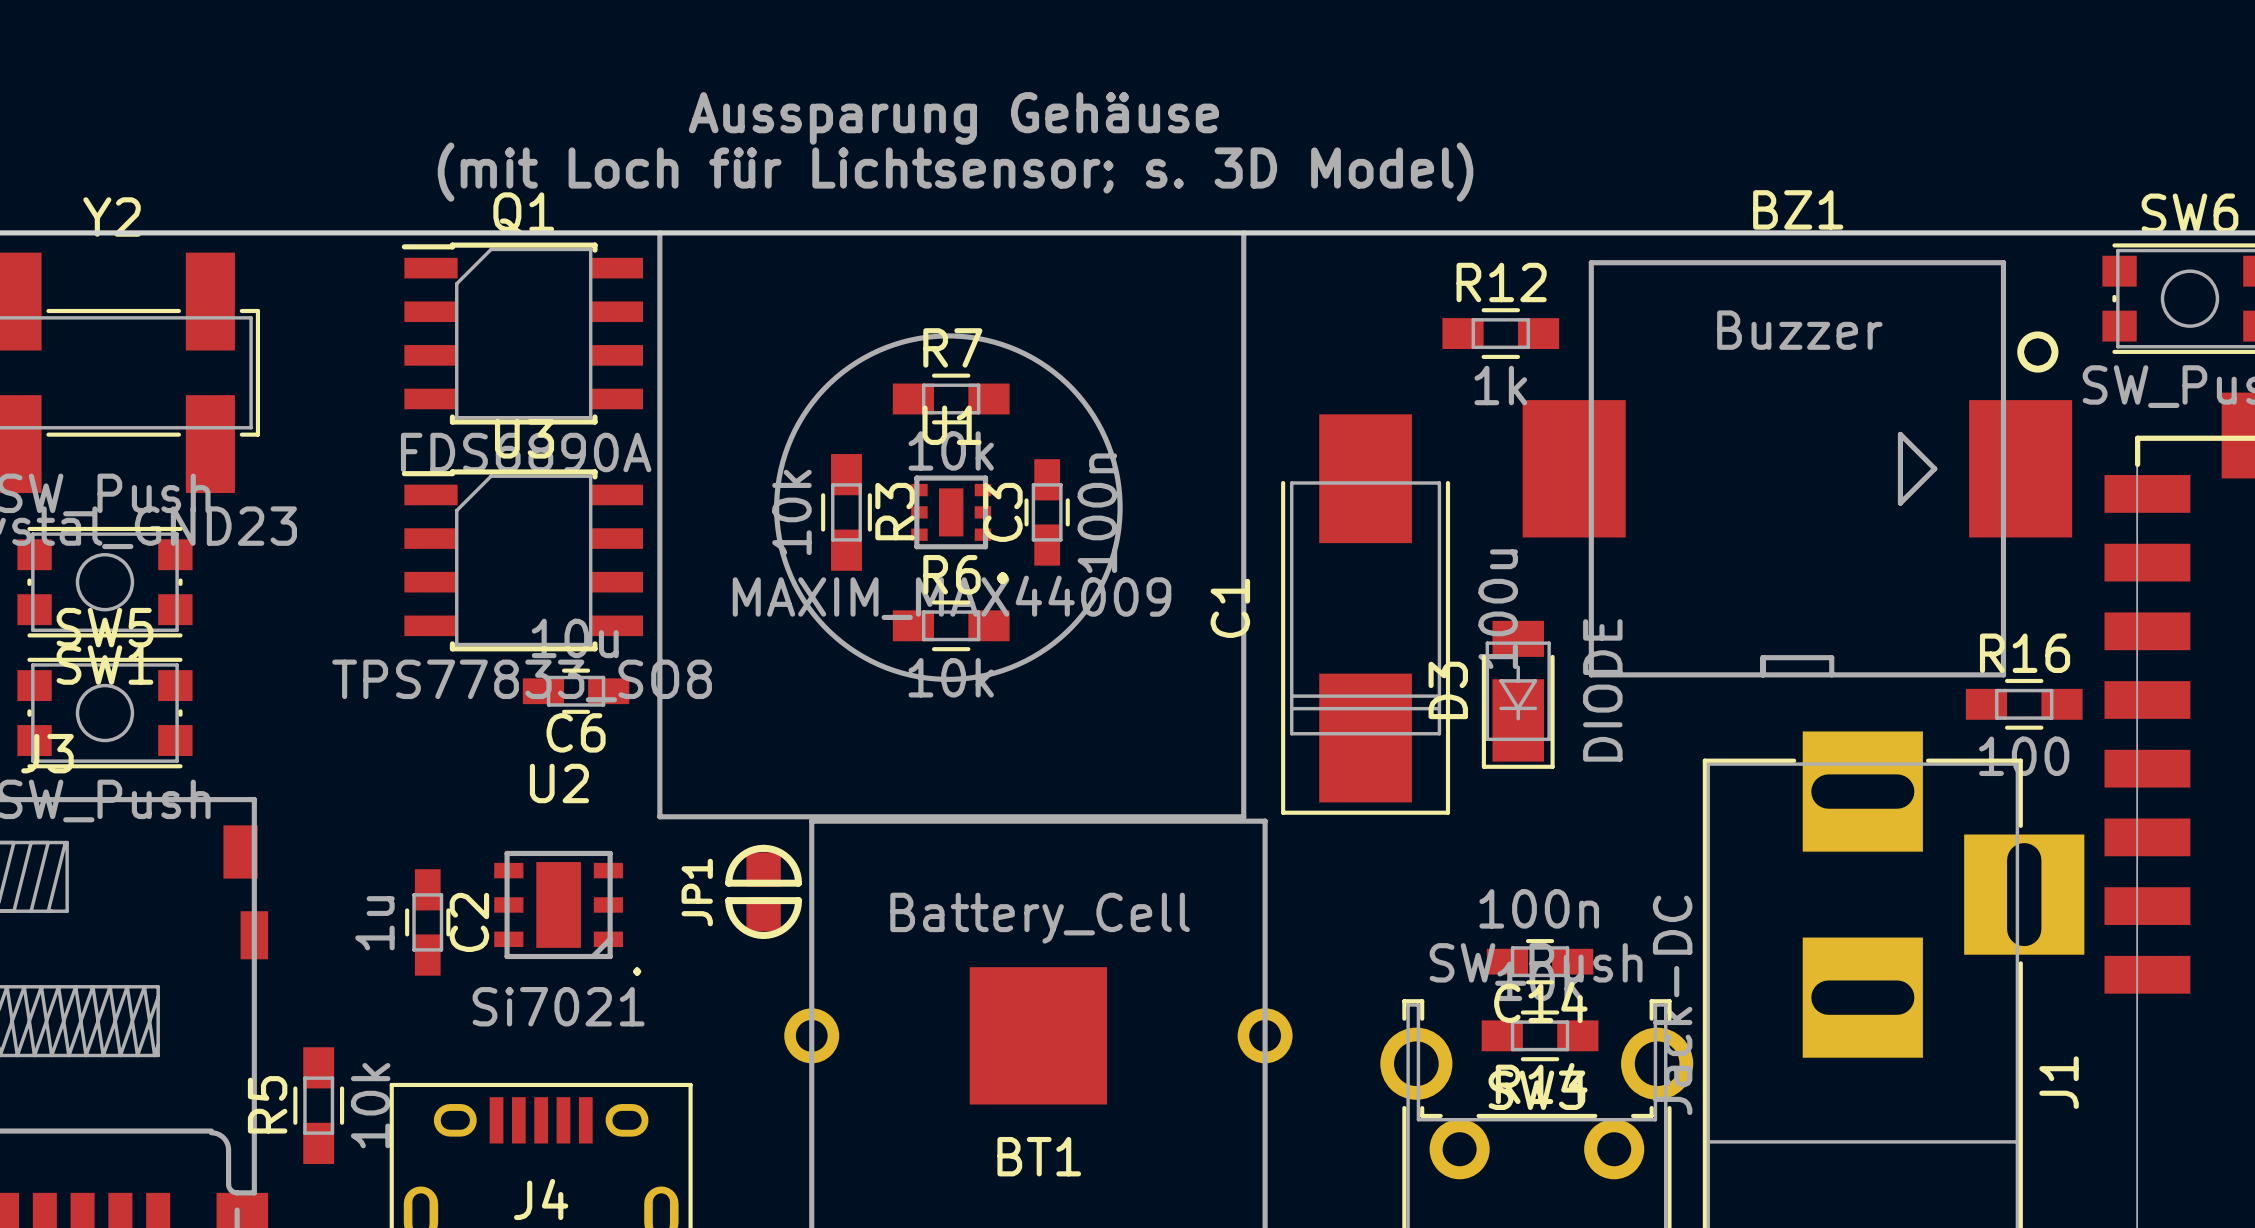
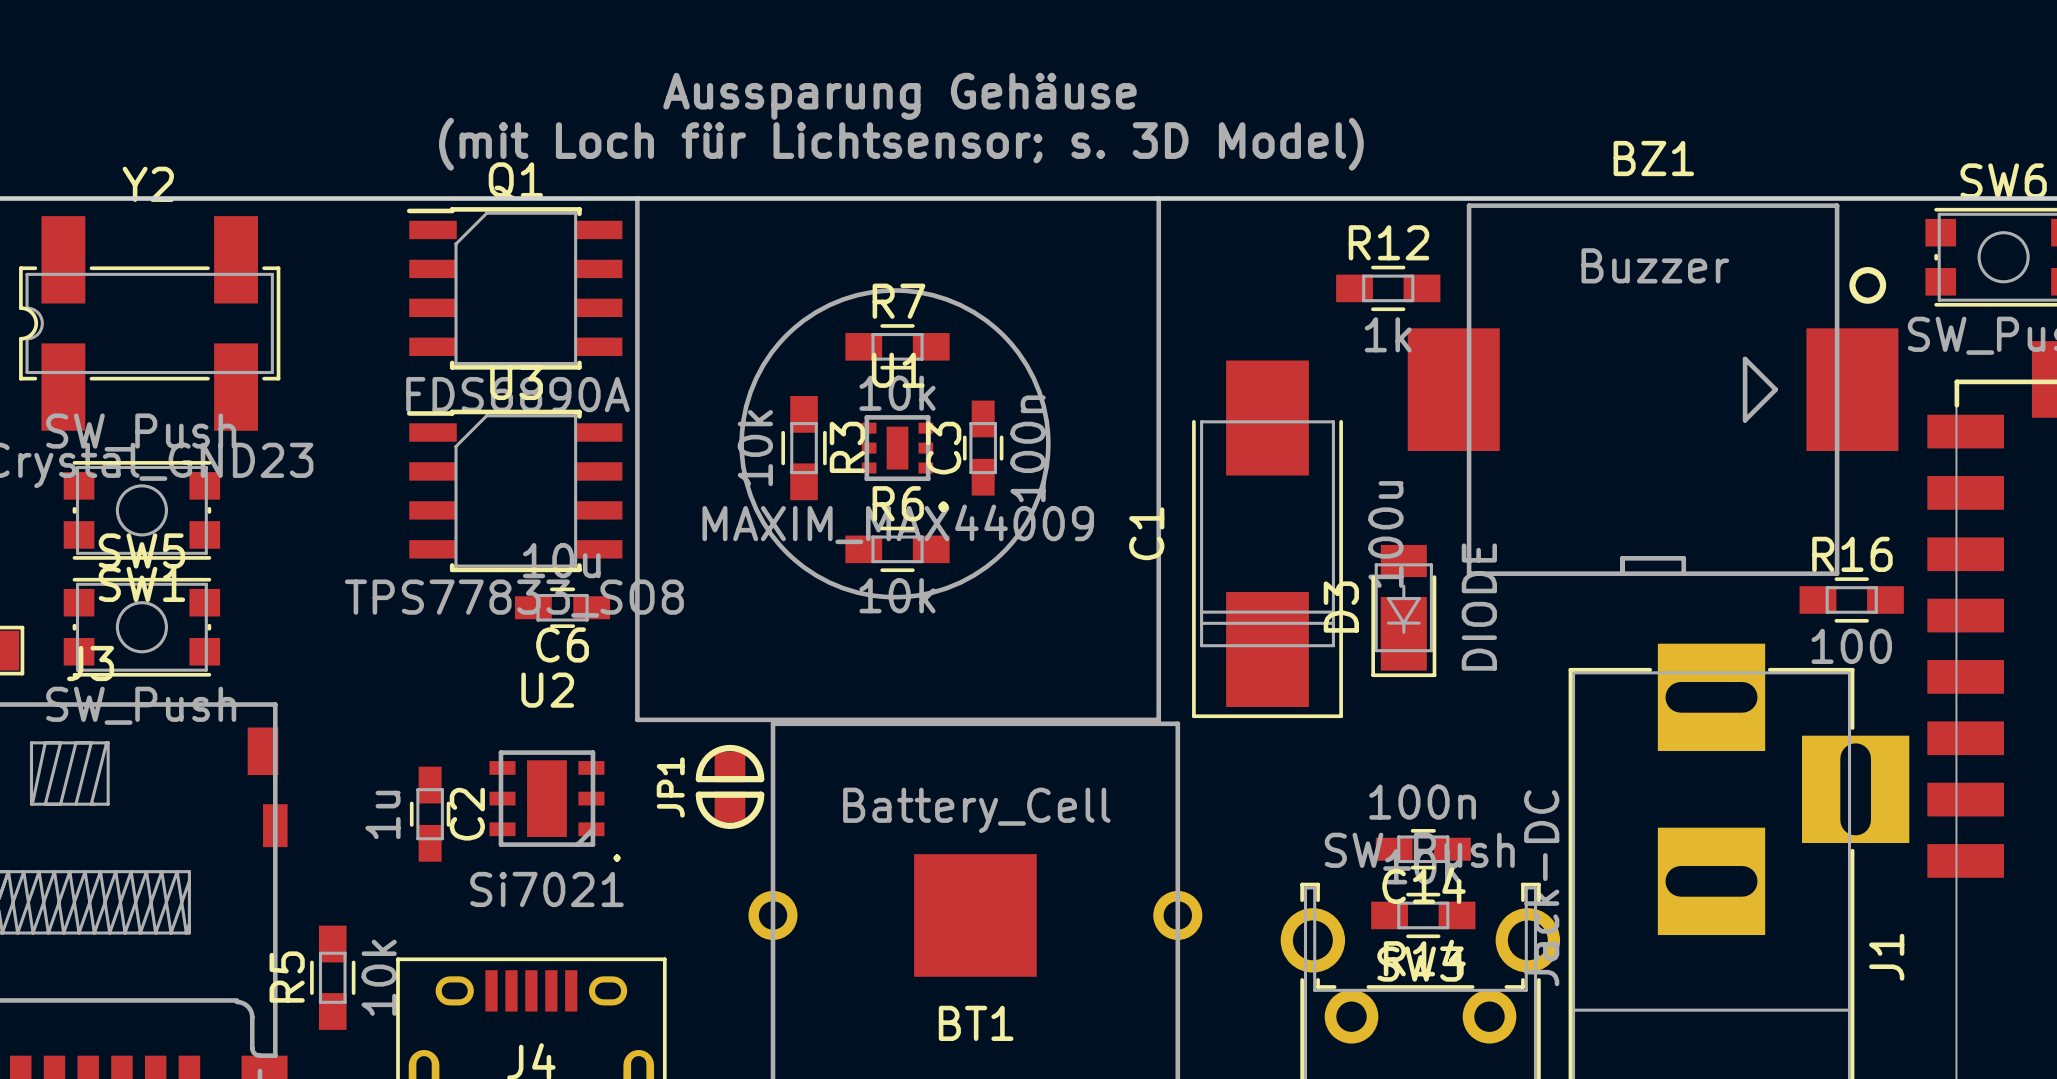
BZ1 position: (1797, 468) -> (1653, 389)
R16 position: (2024, 704) -> (1851, 599)

